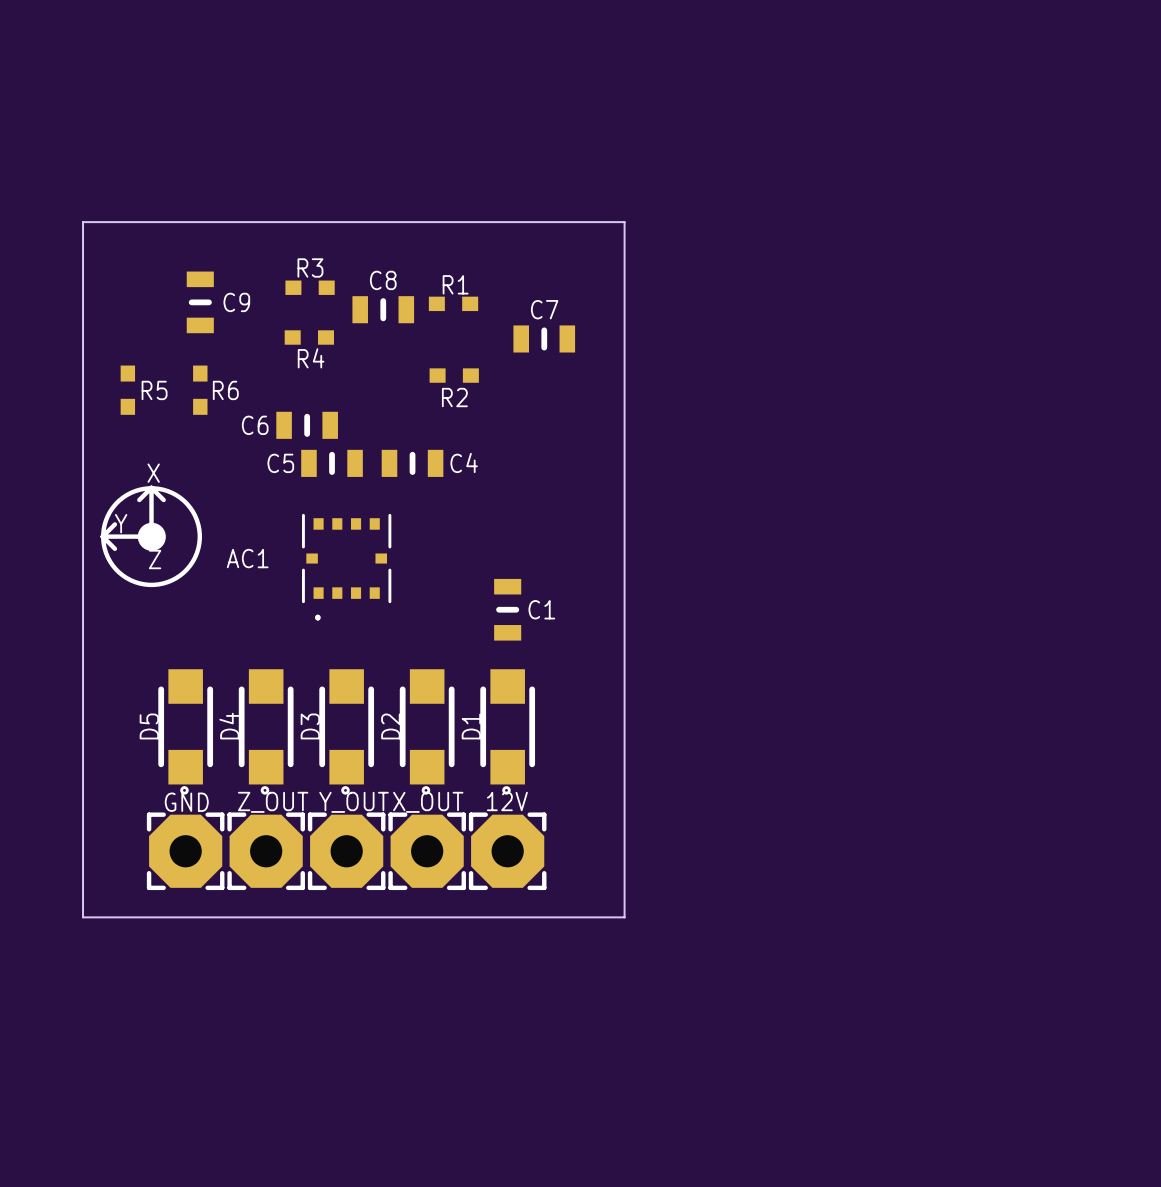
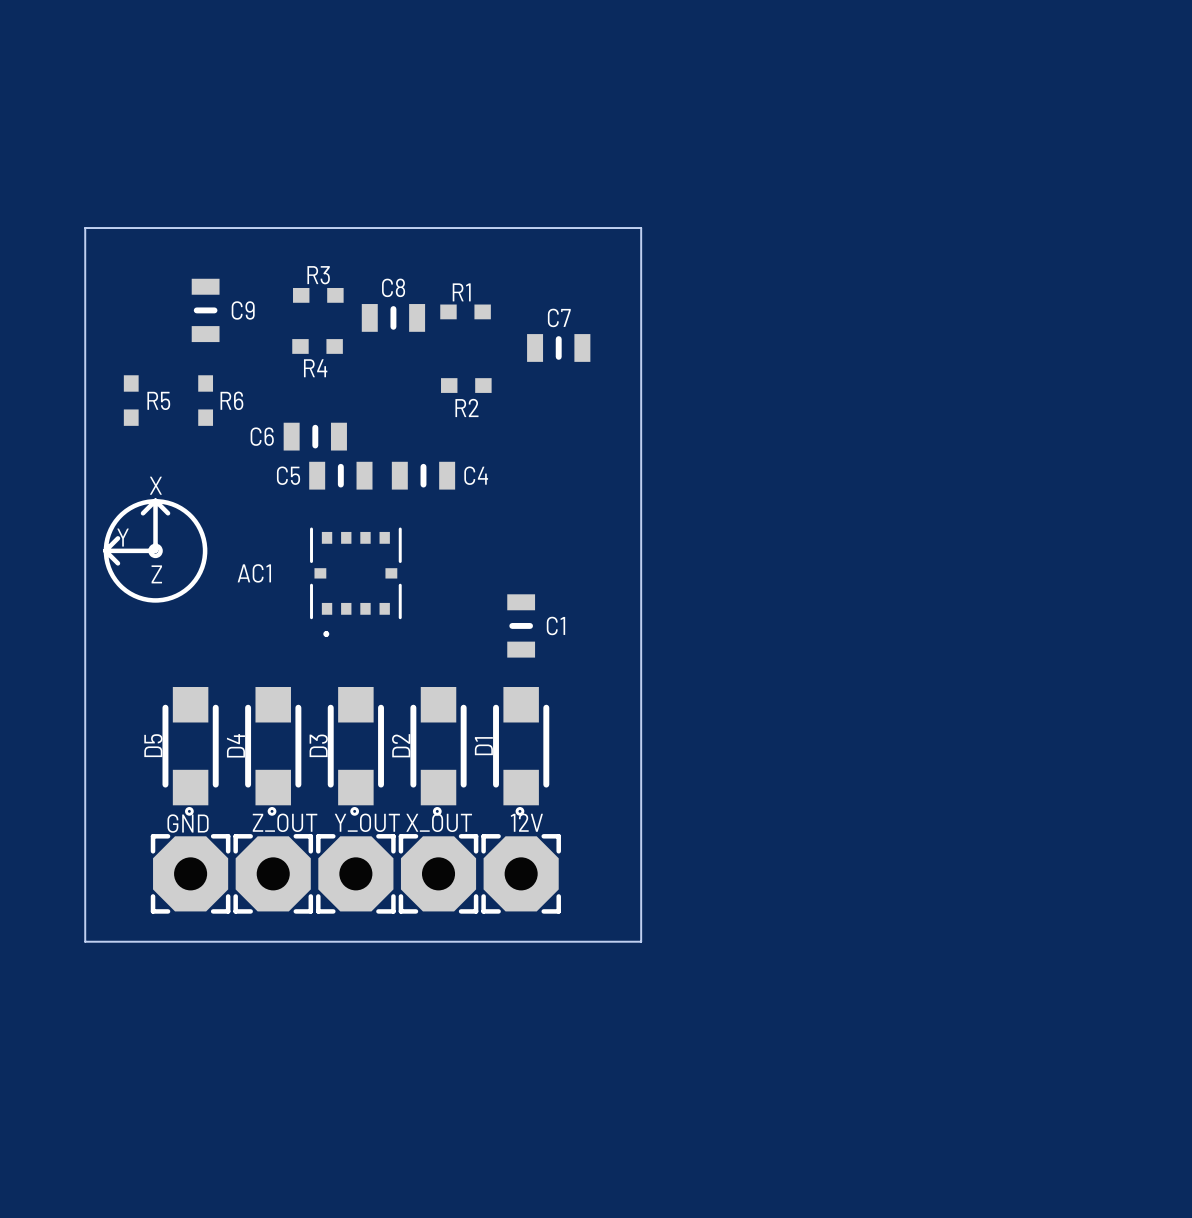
drawing: [137, 522, 166, 551] -> none

